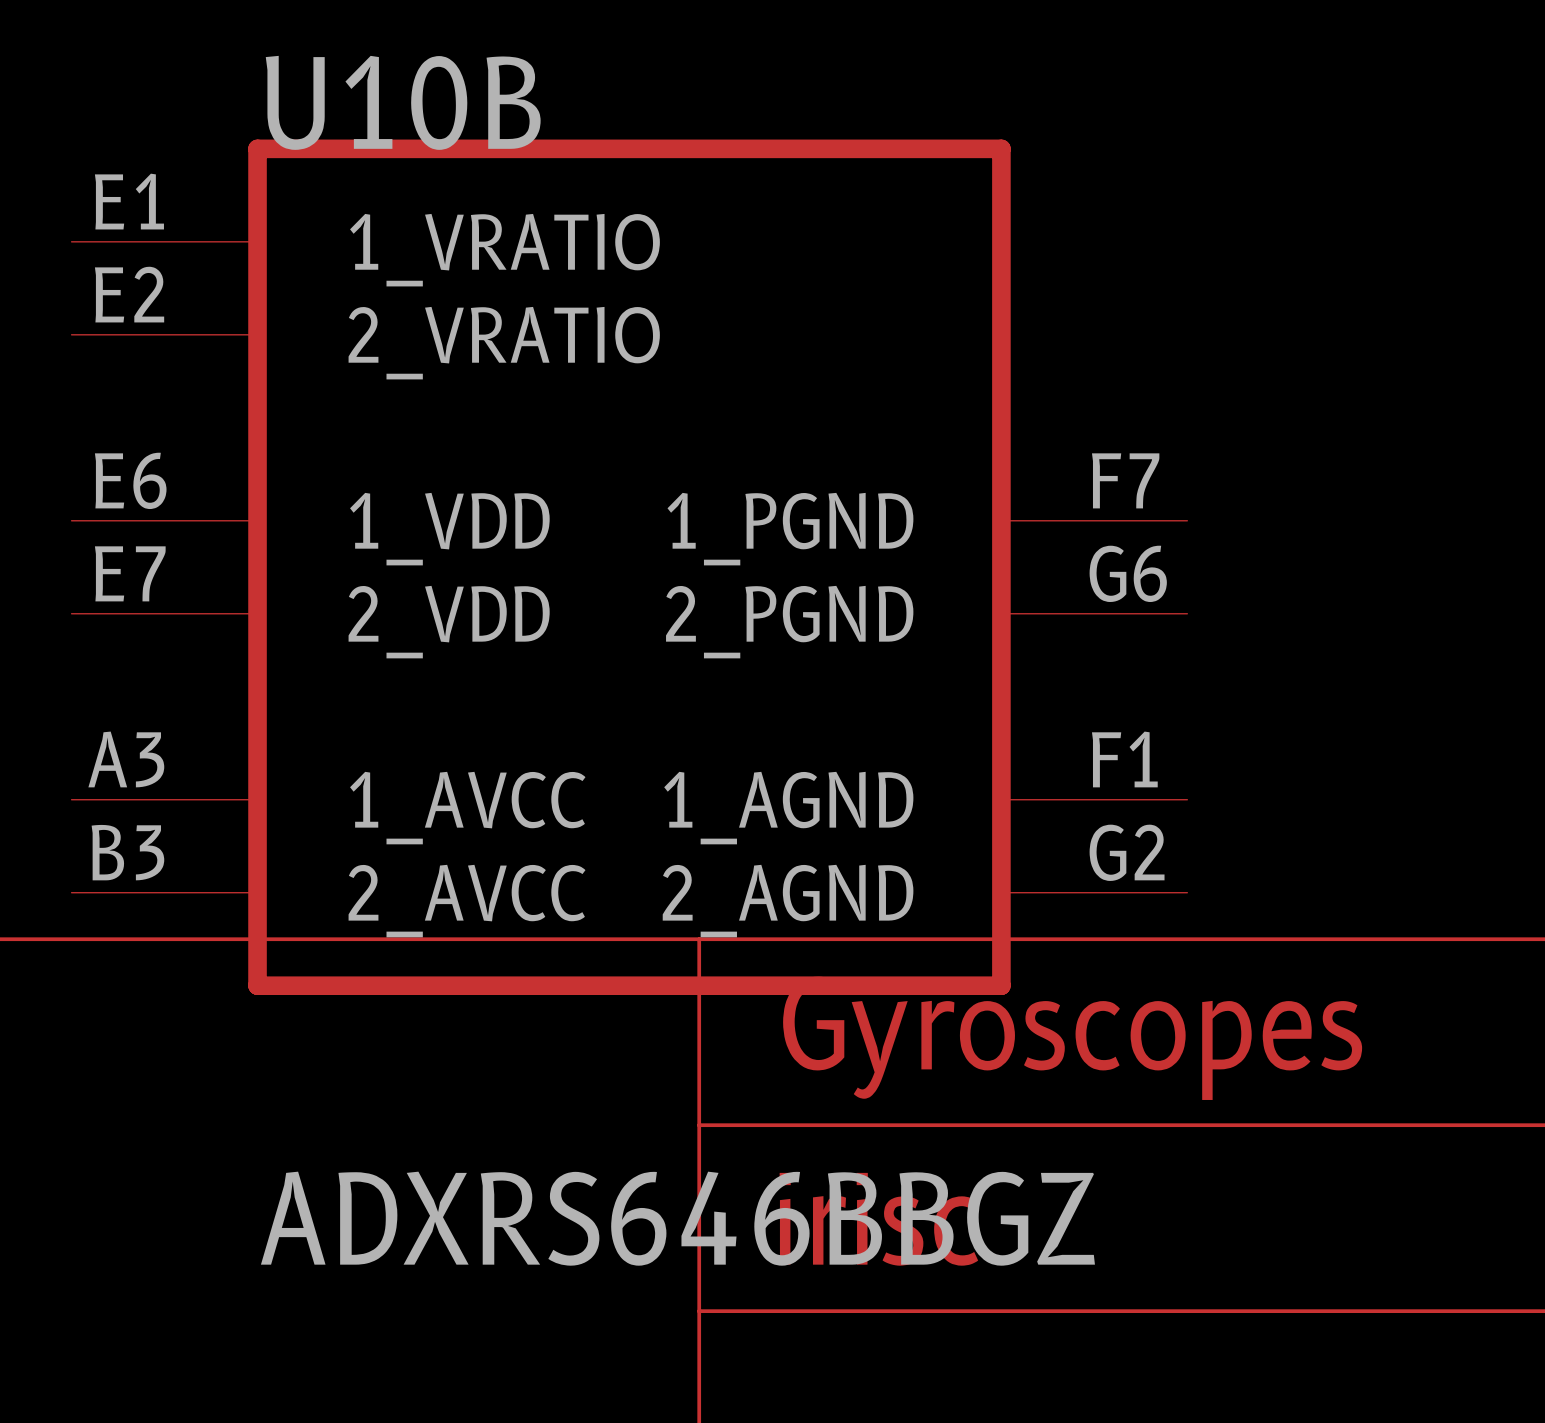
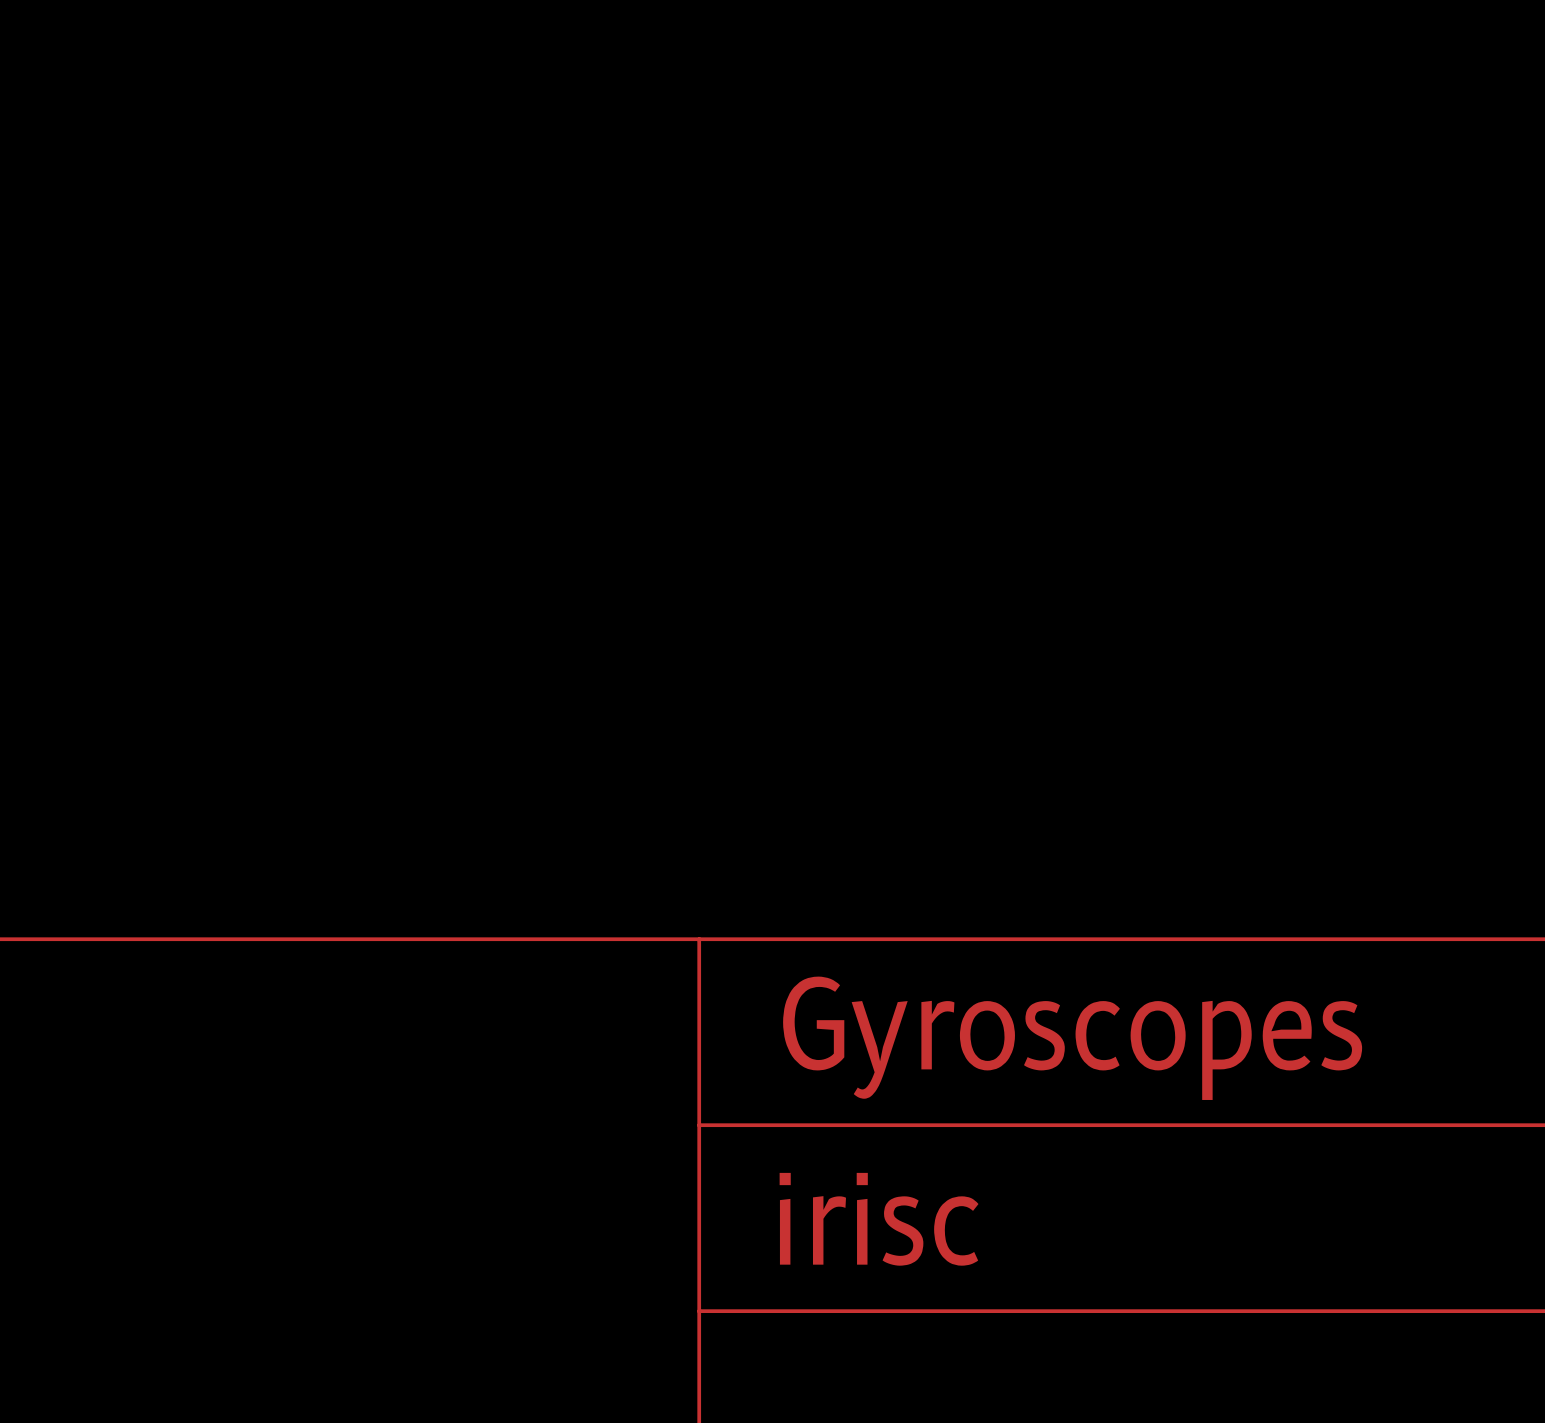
U10B: (629, 567) -> none

